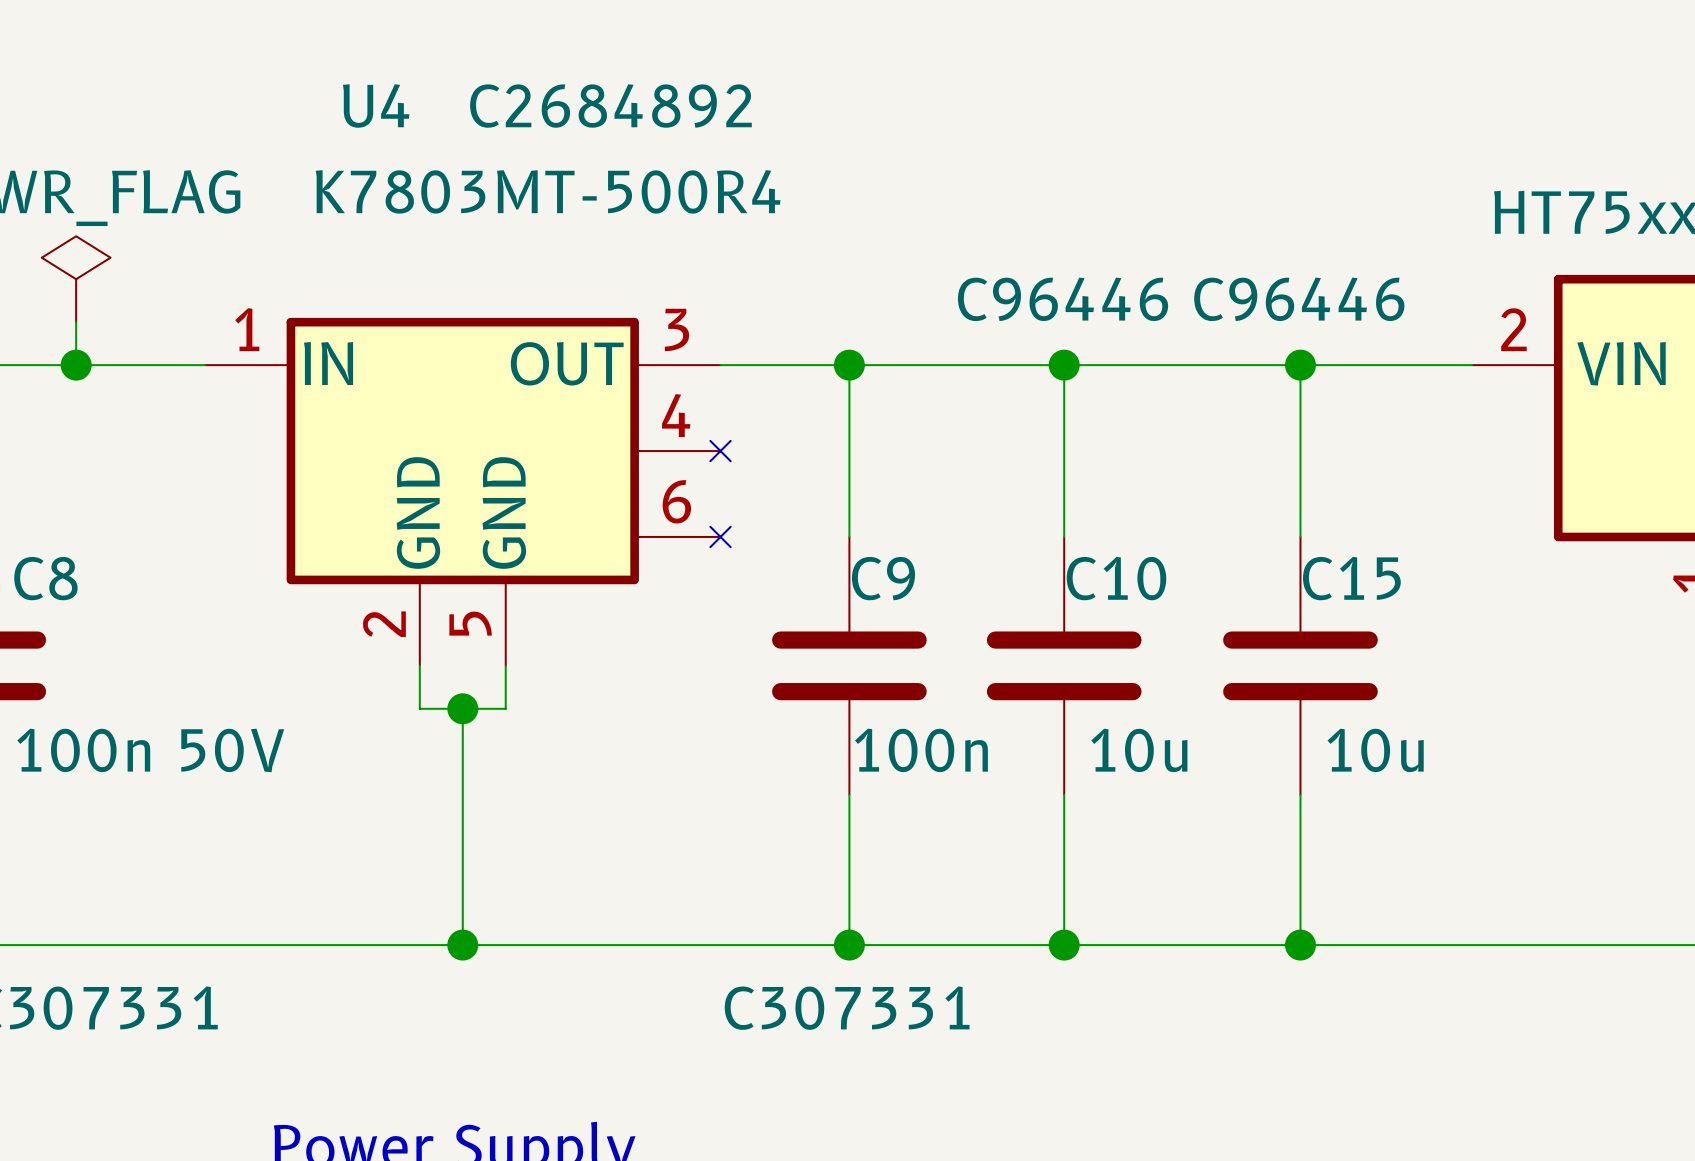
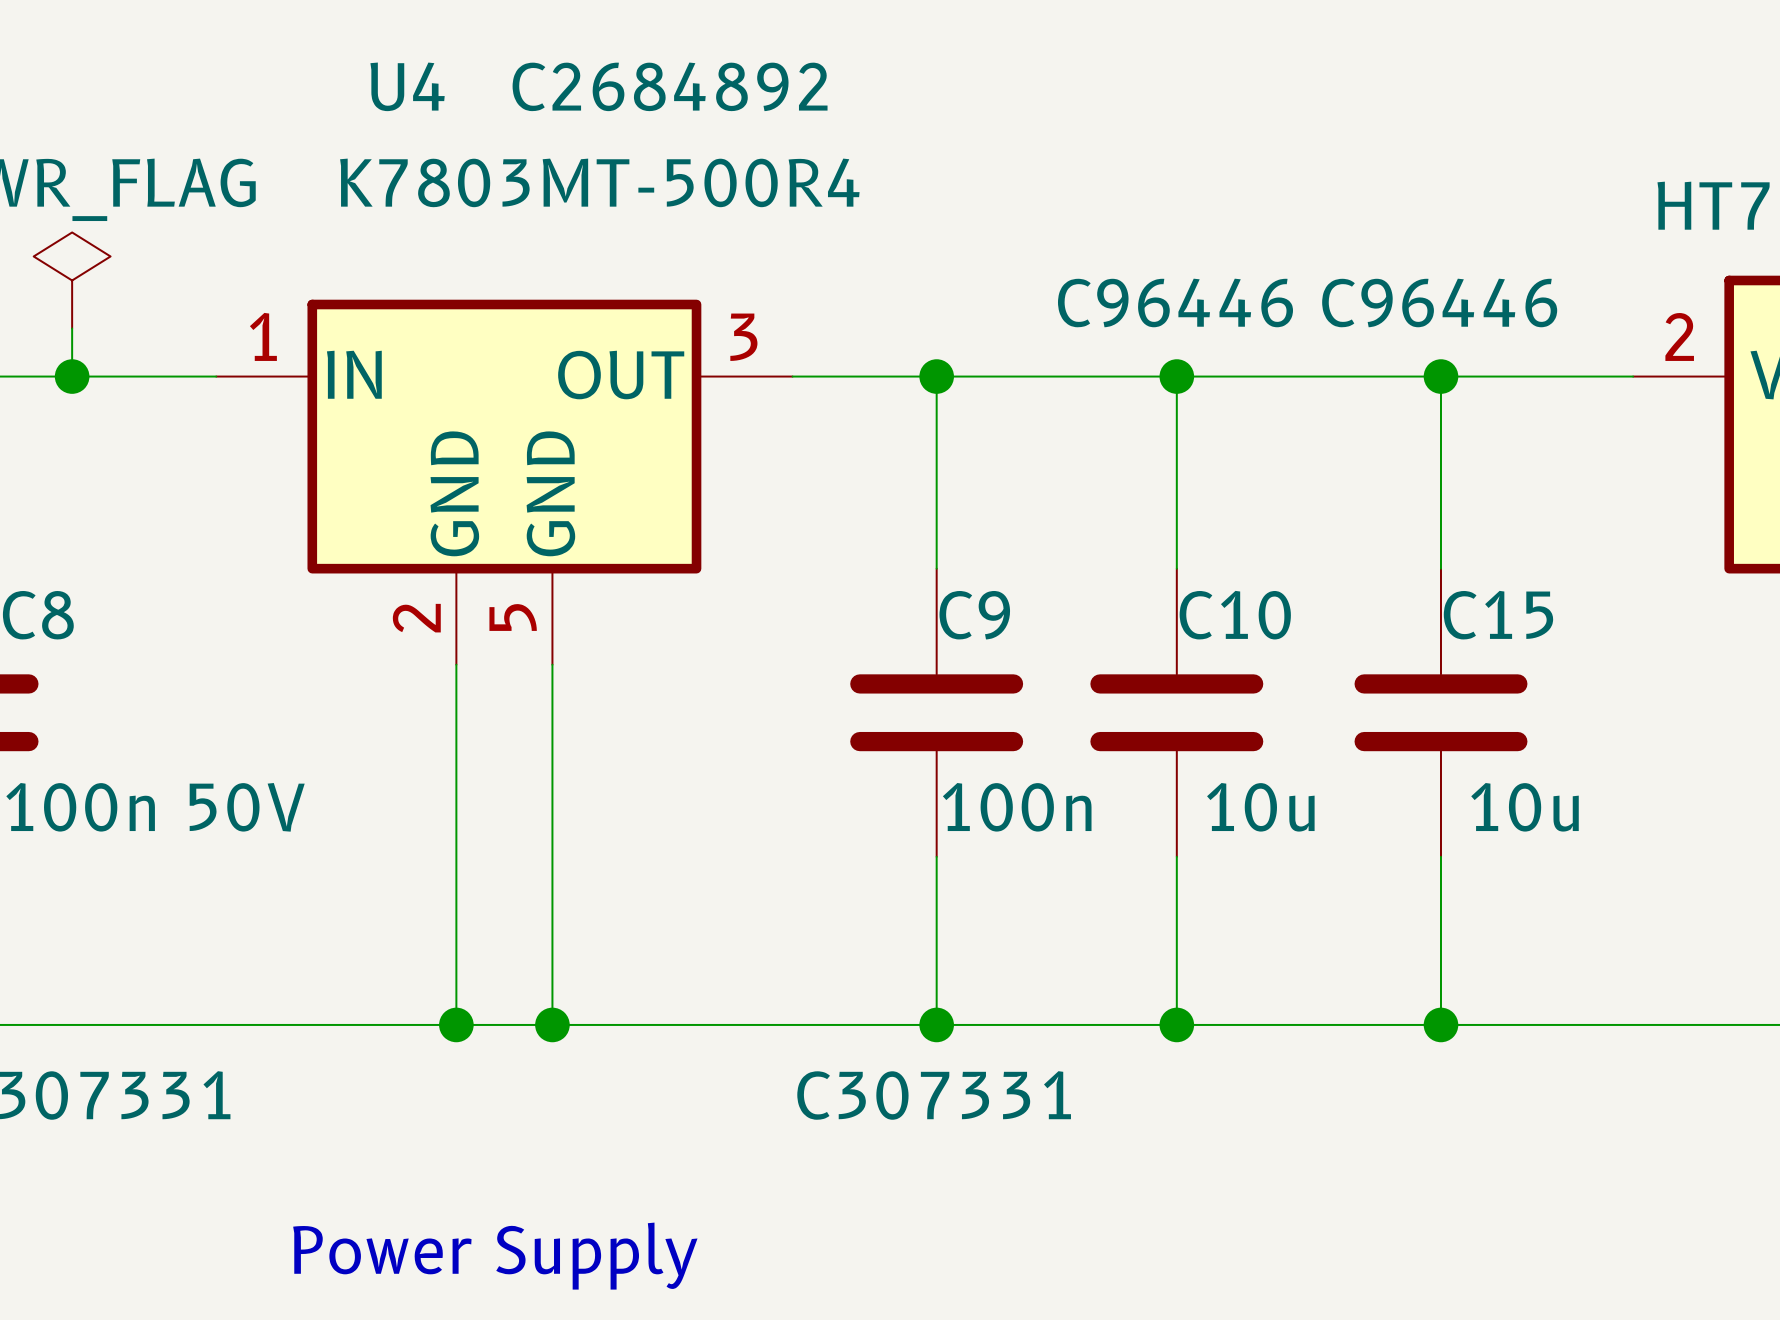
U4 symbol: [205, 317, 731, 666] -> [216, 299, 793, 665]
wire: (419, 708) (505, 708) -> (456, 760) (456, 1024)
wire: (462, 708) (462, 945) -> (552, 760) (552, 1024)
junction: (462, 708) -> none
junction: none -> (456, 1024)
junction: (462, 945) -> none
junction: none -> (552, 1024)

